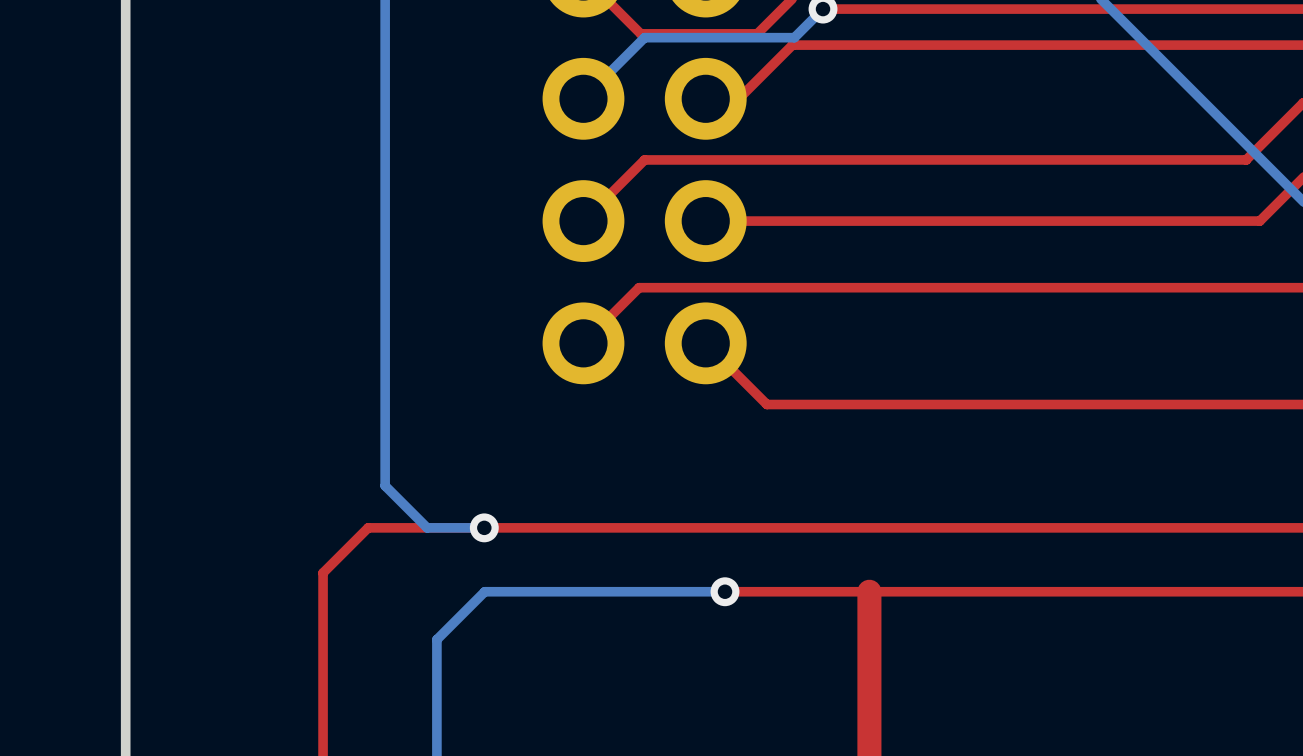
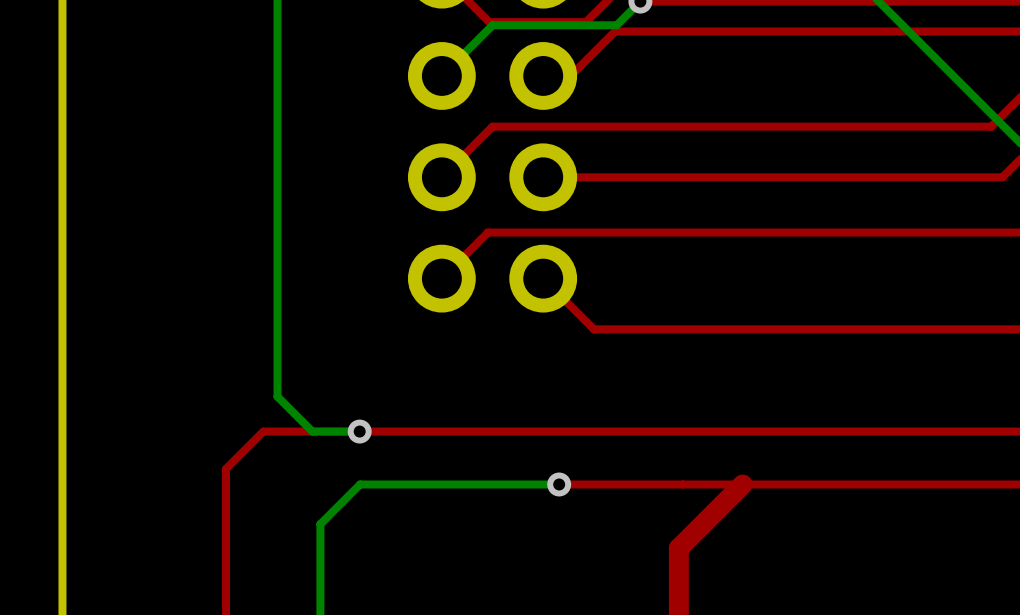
top track: (869, 591) (869, 668) -> (742, 484) (678, 548)

